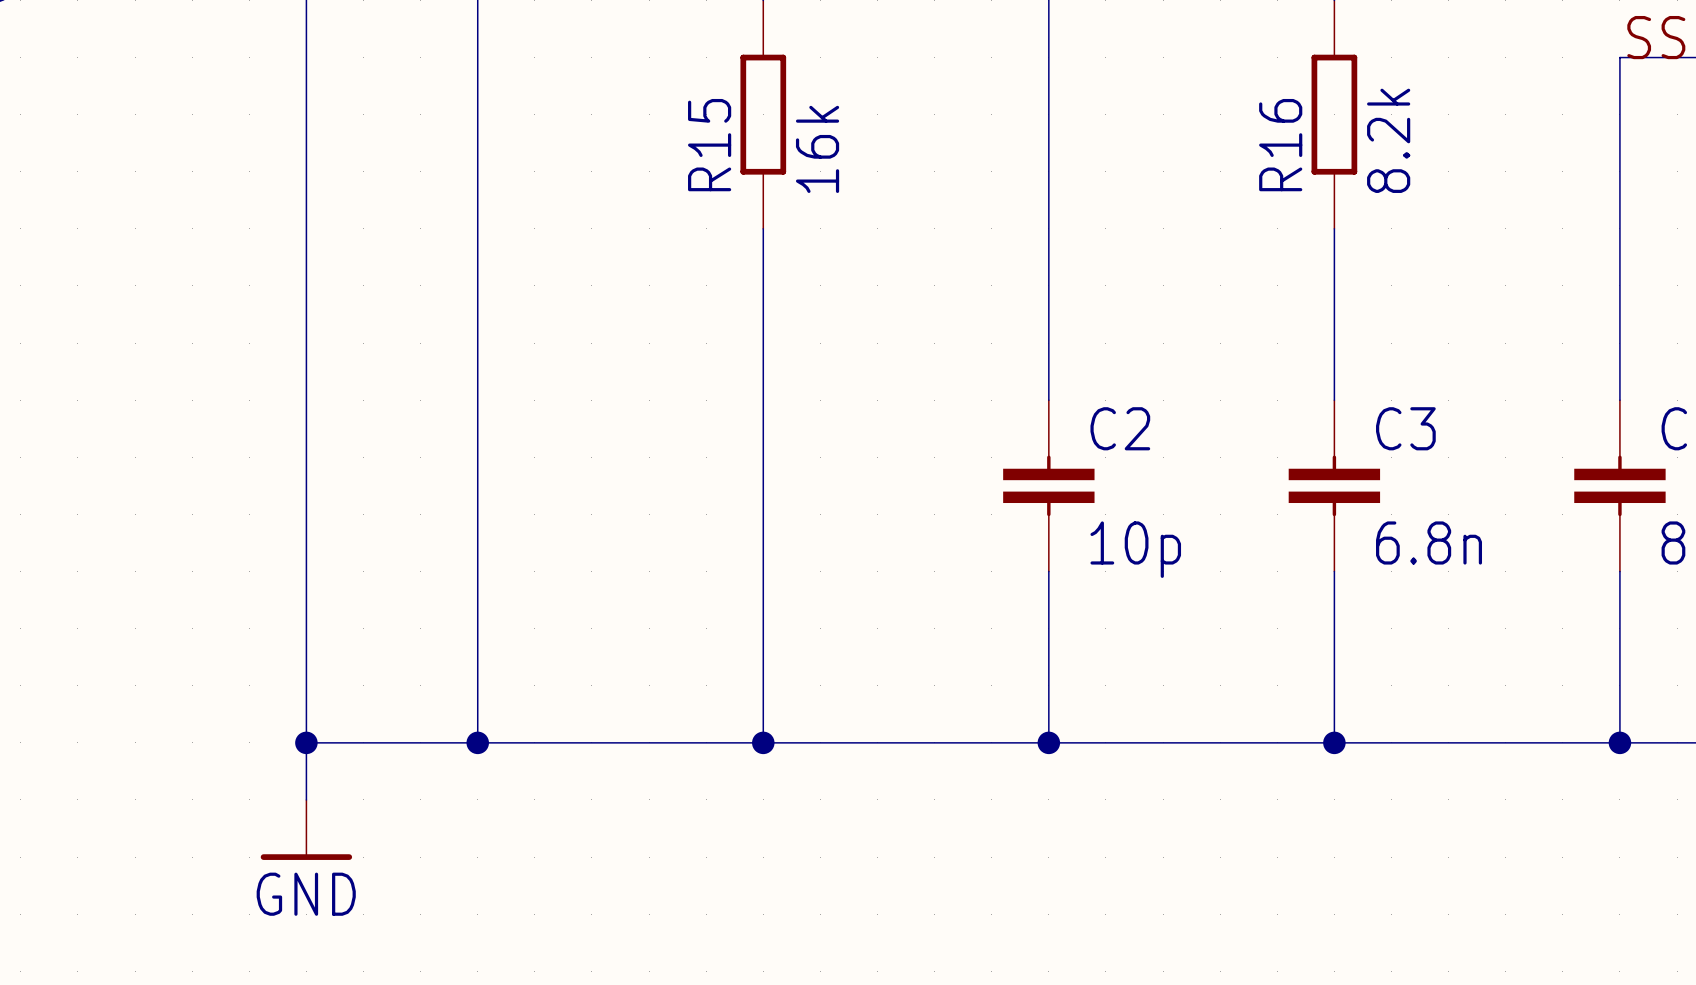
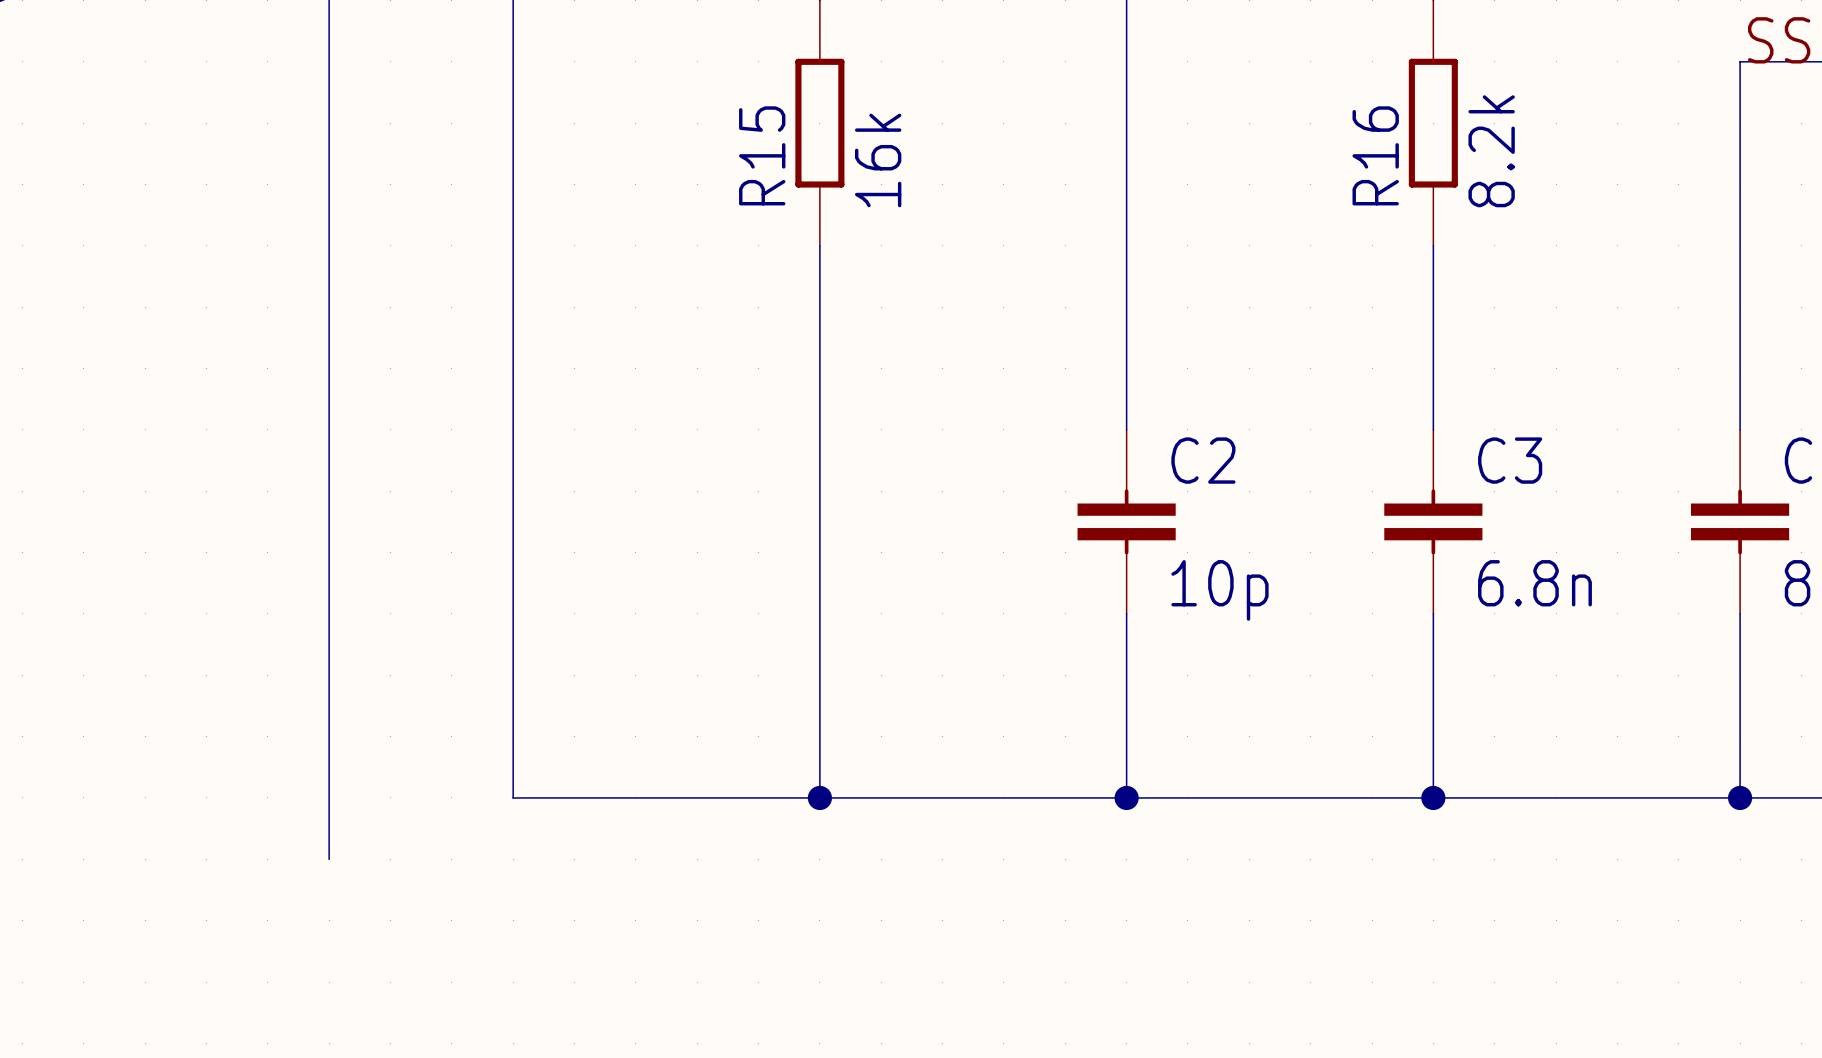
wire: (306, 742) (477, 742) -> none
junction: (306, 742) -> none
junction: (477, 742) -> none
power symbol: GND (306, 829) -> none

